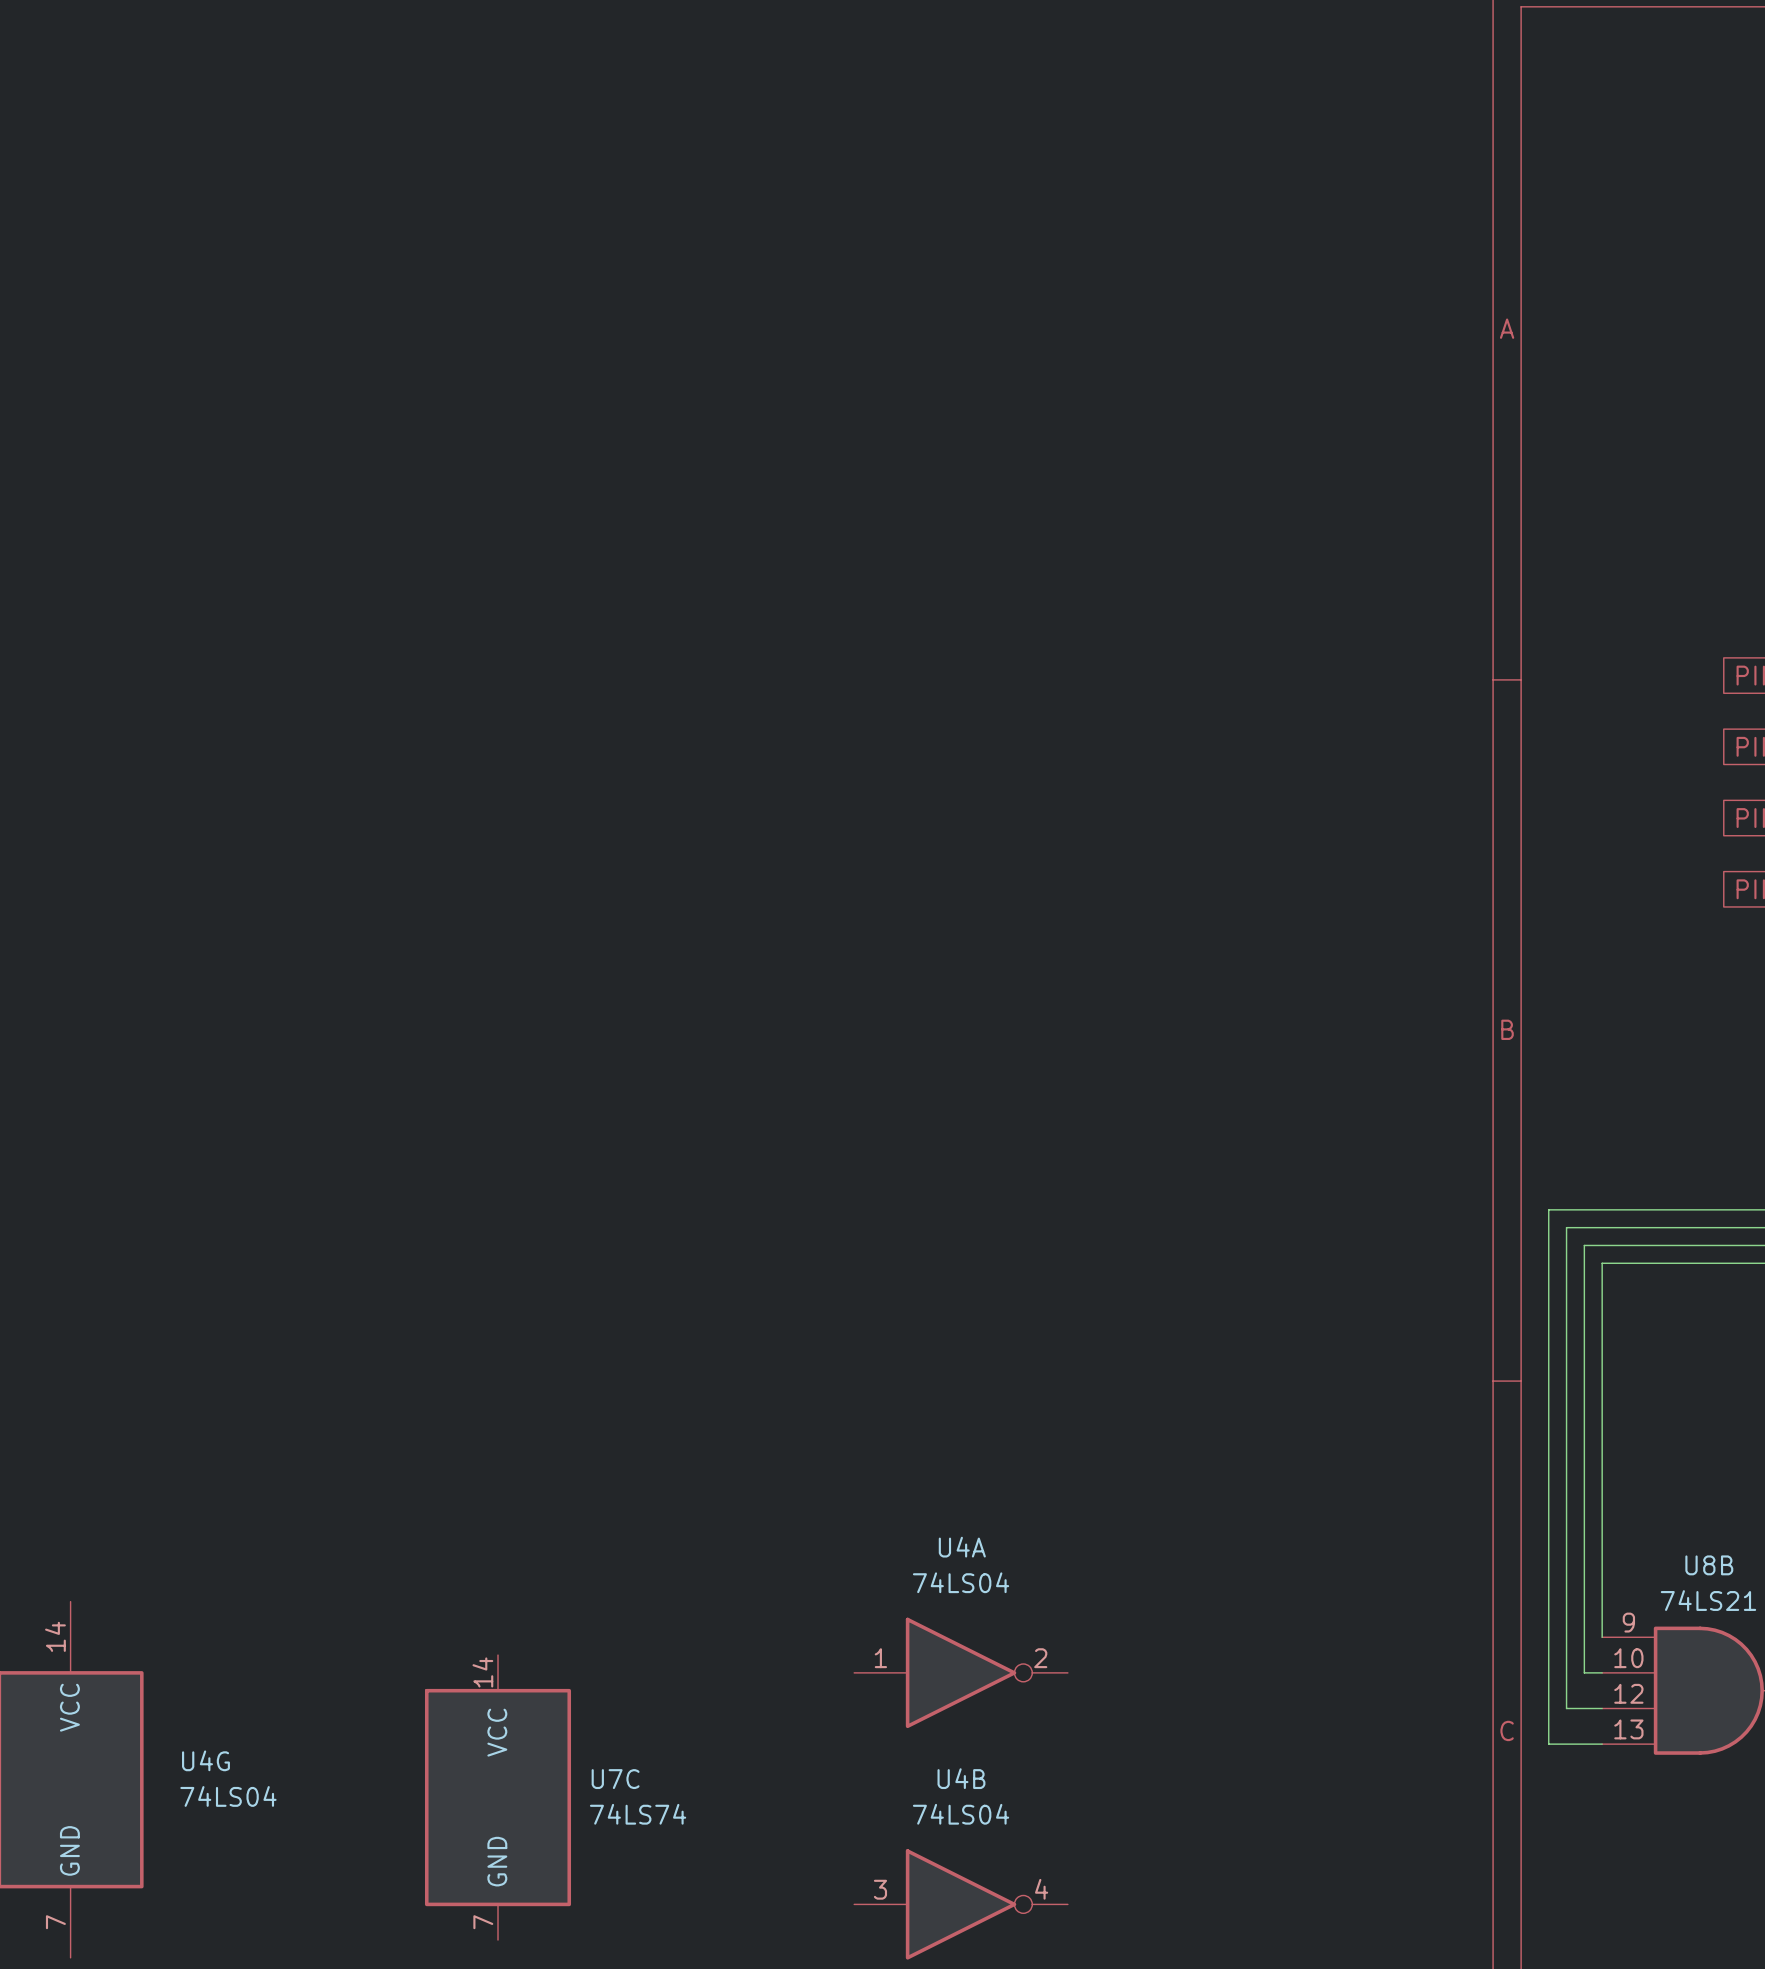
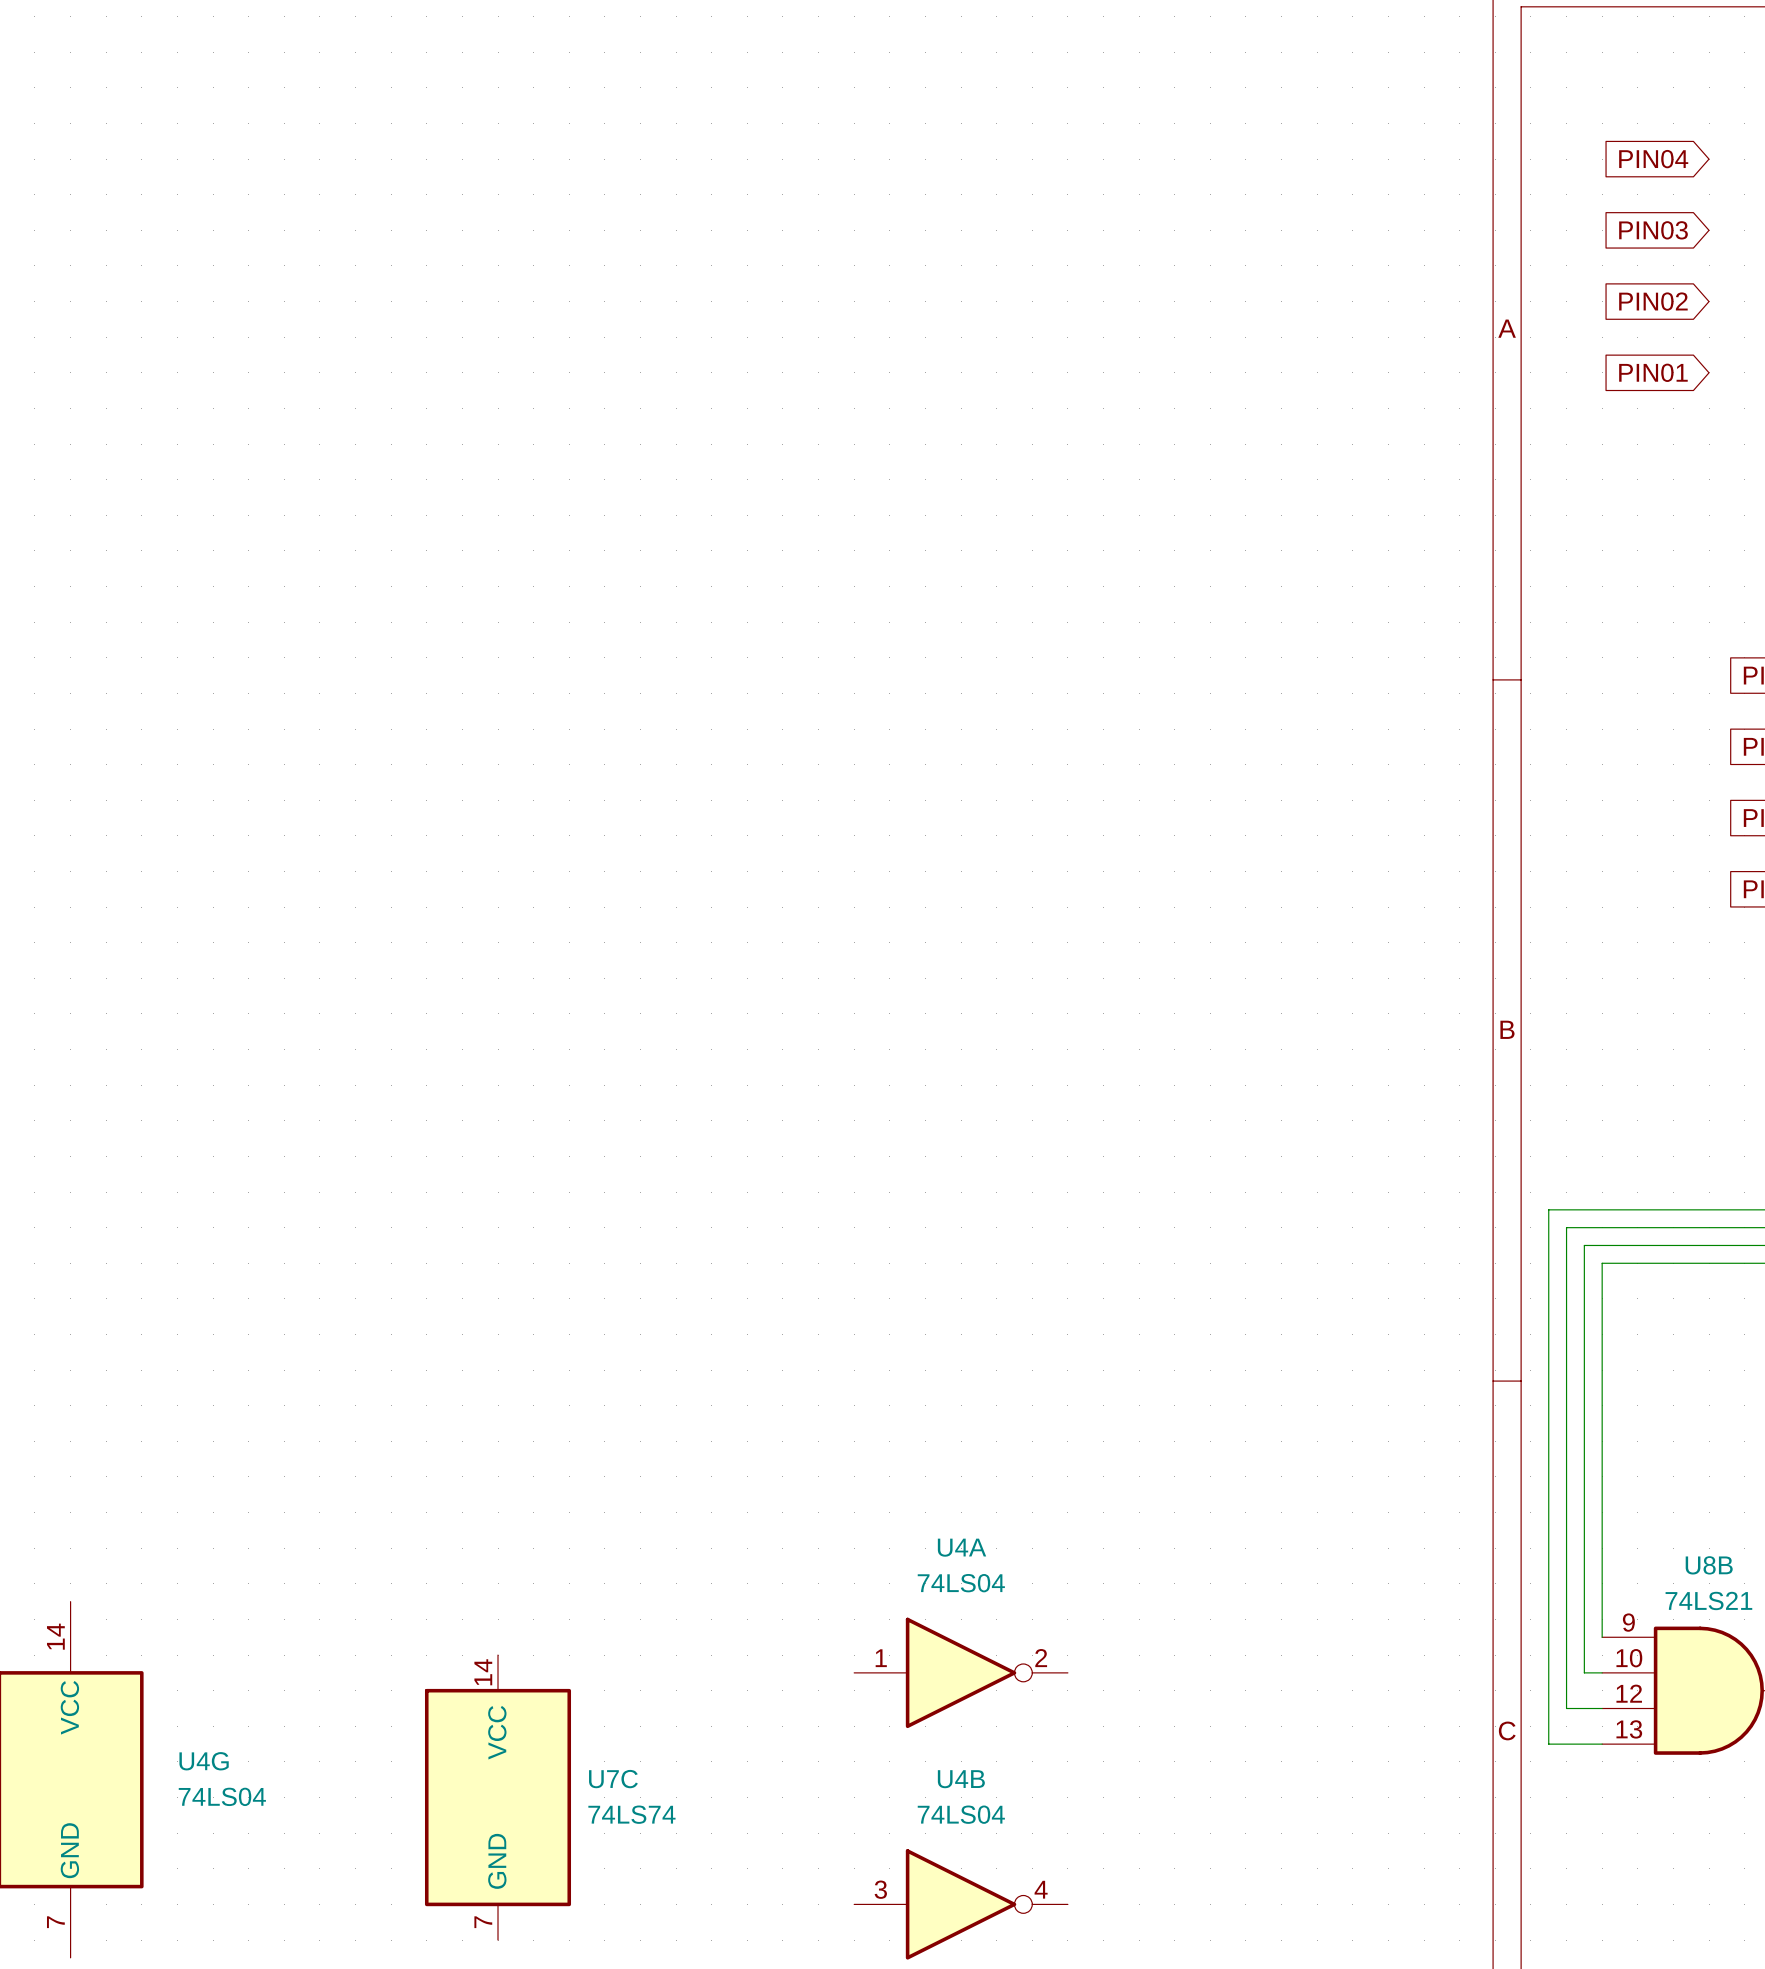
global label: none -> PIN04 (1653, 159)
global label: none -> PIN03 (1653, 230)
global label: none -> PIN02 (1653, 301)
global label: none -> PIN01 (1653, 372)

